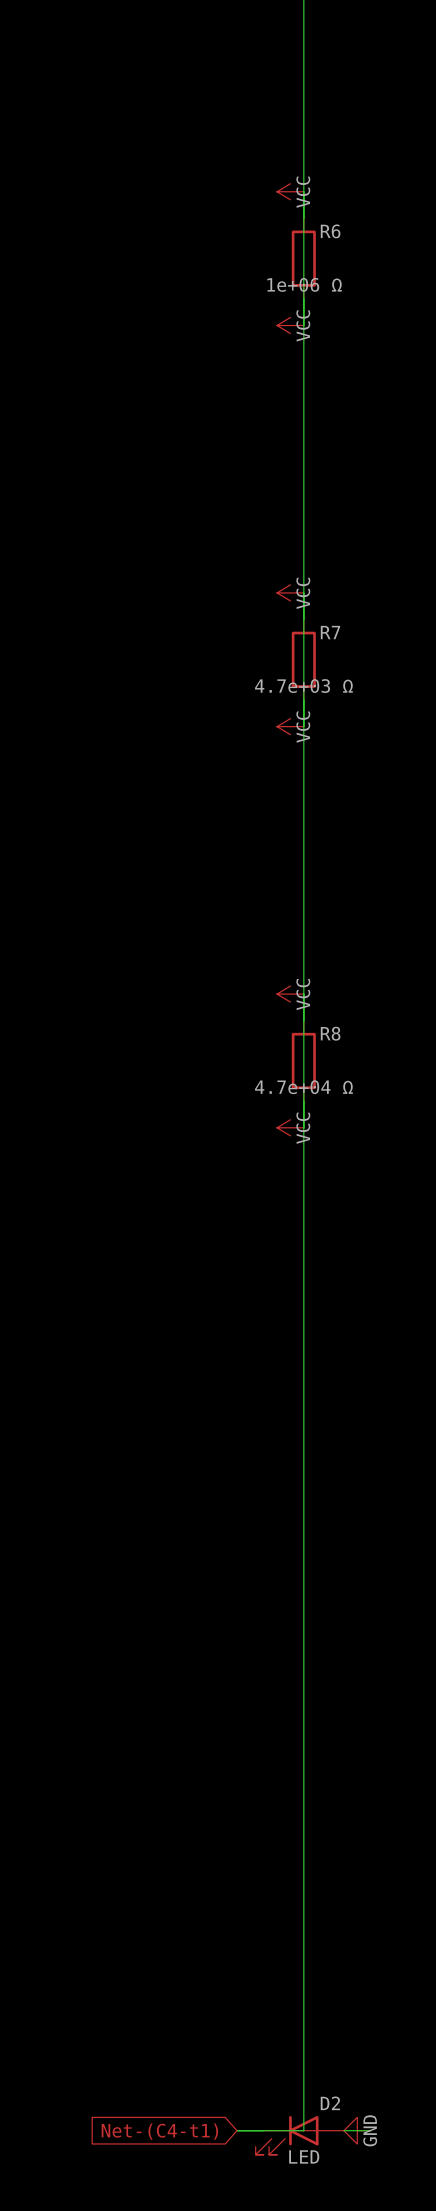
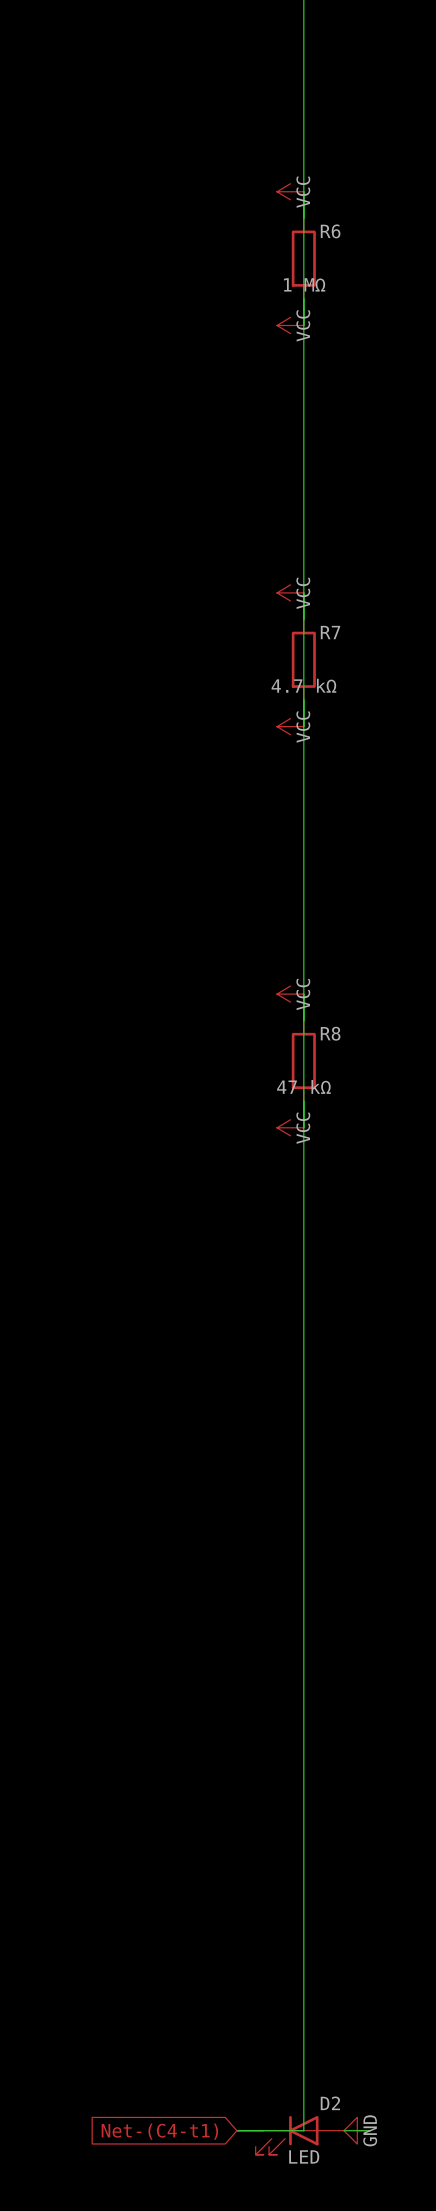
R6 value: 1e+06 Ω (304, 284) -> 1 MΩ (304, 284)
R7 value: 4.7e+03 Ω (303, 686) -> 4.7 kΩ (303, 685)
R8 value: 4.7e+04 Ω (303, 1087) -> 47 kΩ (303, 1086)

